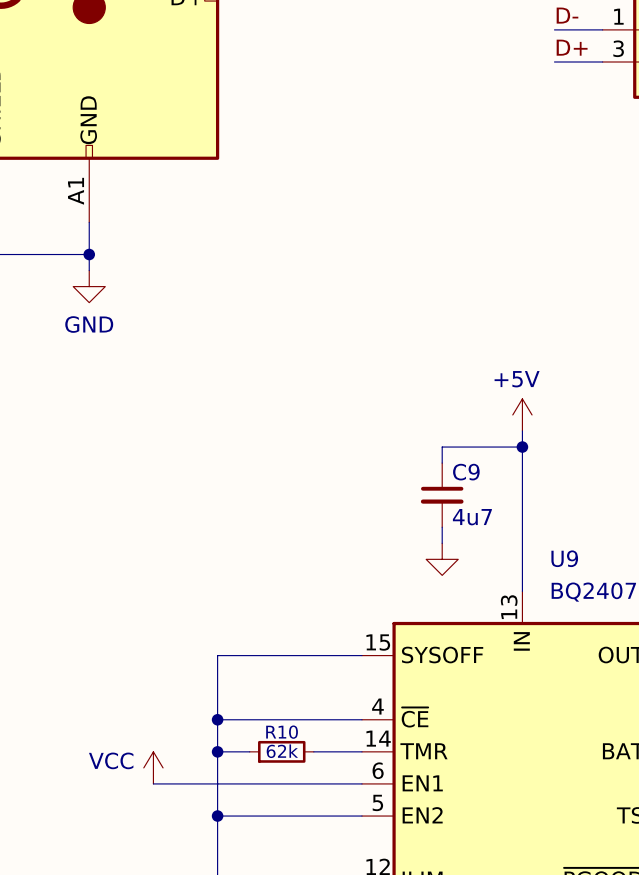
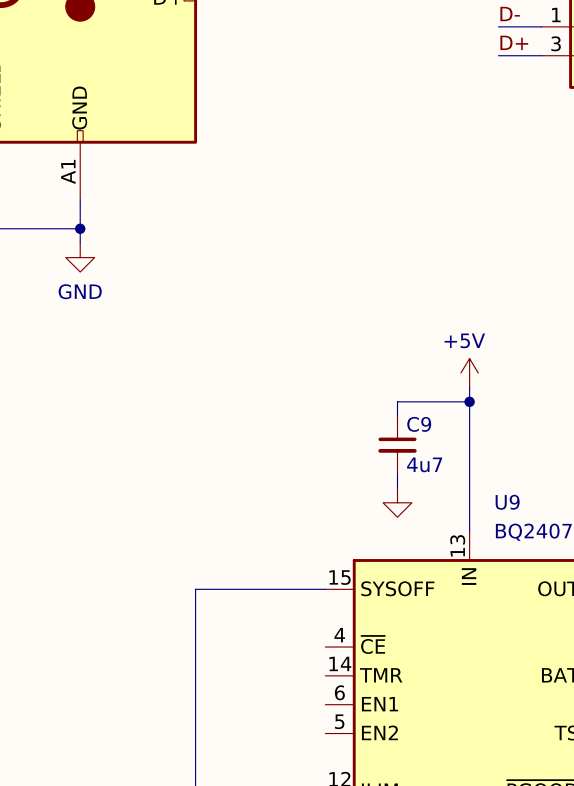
wire: (217, 719) (361, 719) -> none
junction: (217, 719) -> none
wire: (217, 751) (249, 751) -> none
junction: (217, 751) -> none
R10: 62k (281, 751) -> none
wire: (313, 751) (361, 751) -> none
power symbol: VCC (153, 767) -> none
wire: (153, 783) (361, 783) -> none
wire: (217, 816) (361, 816) -> none
junction: (217, 816) -> none

